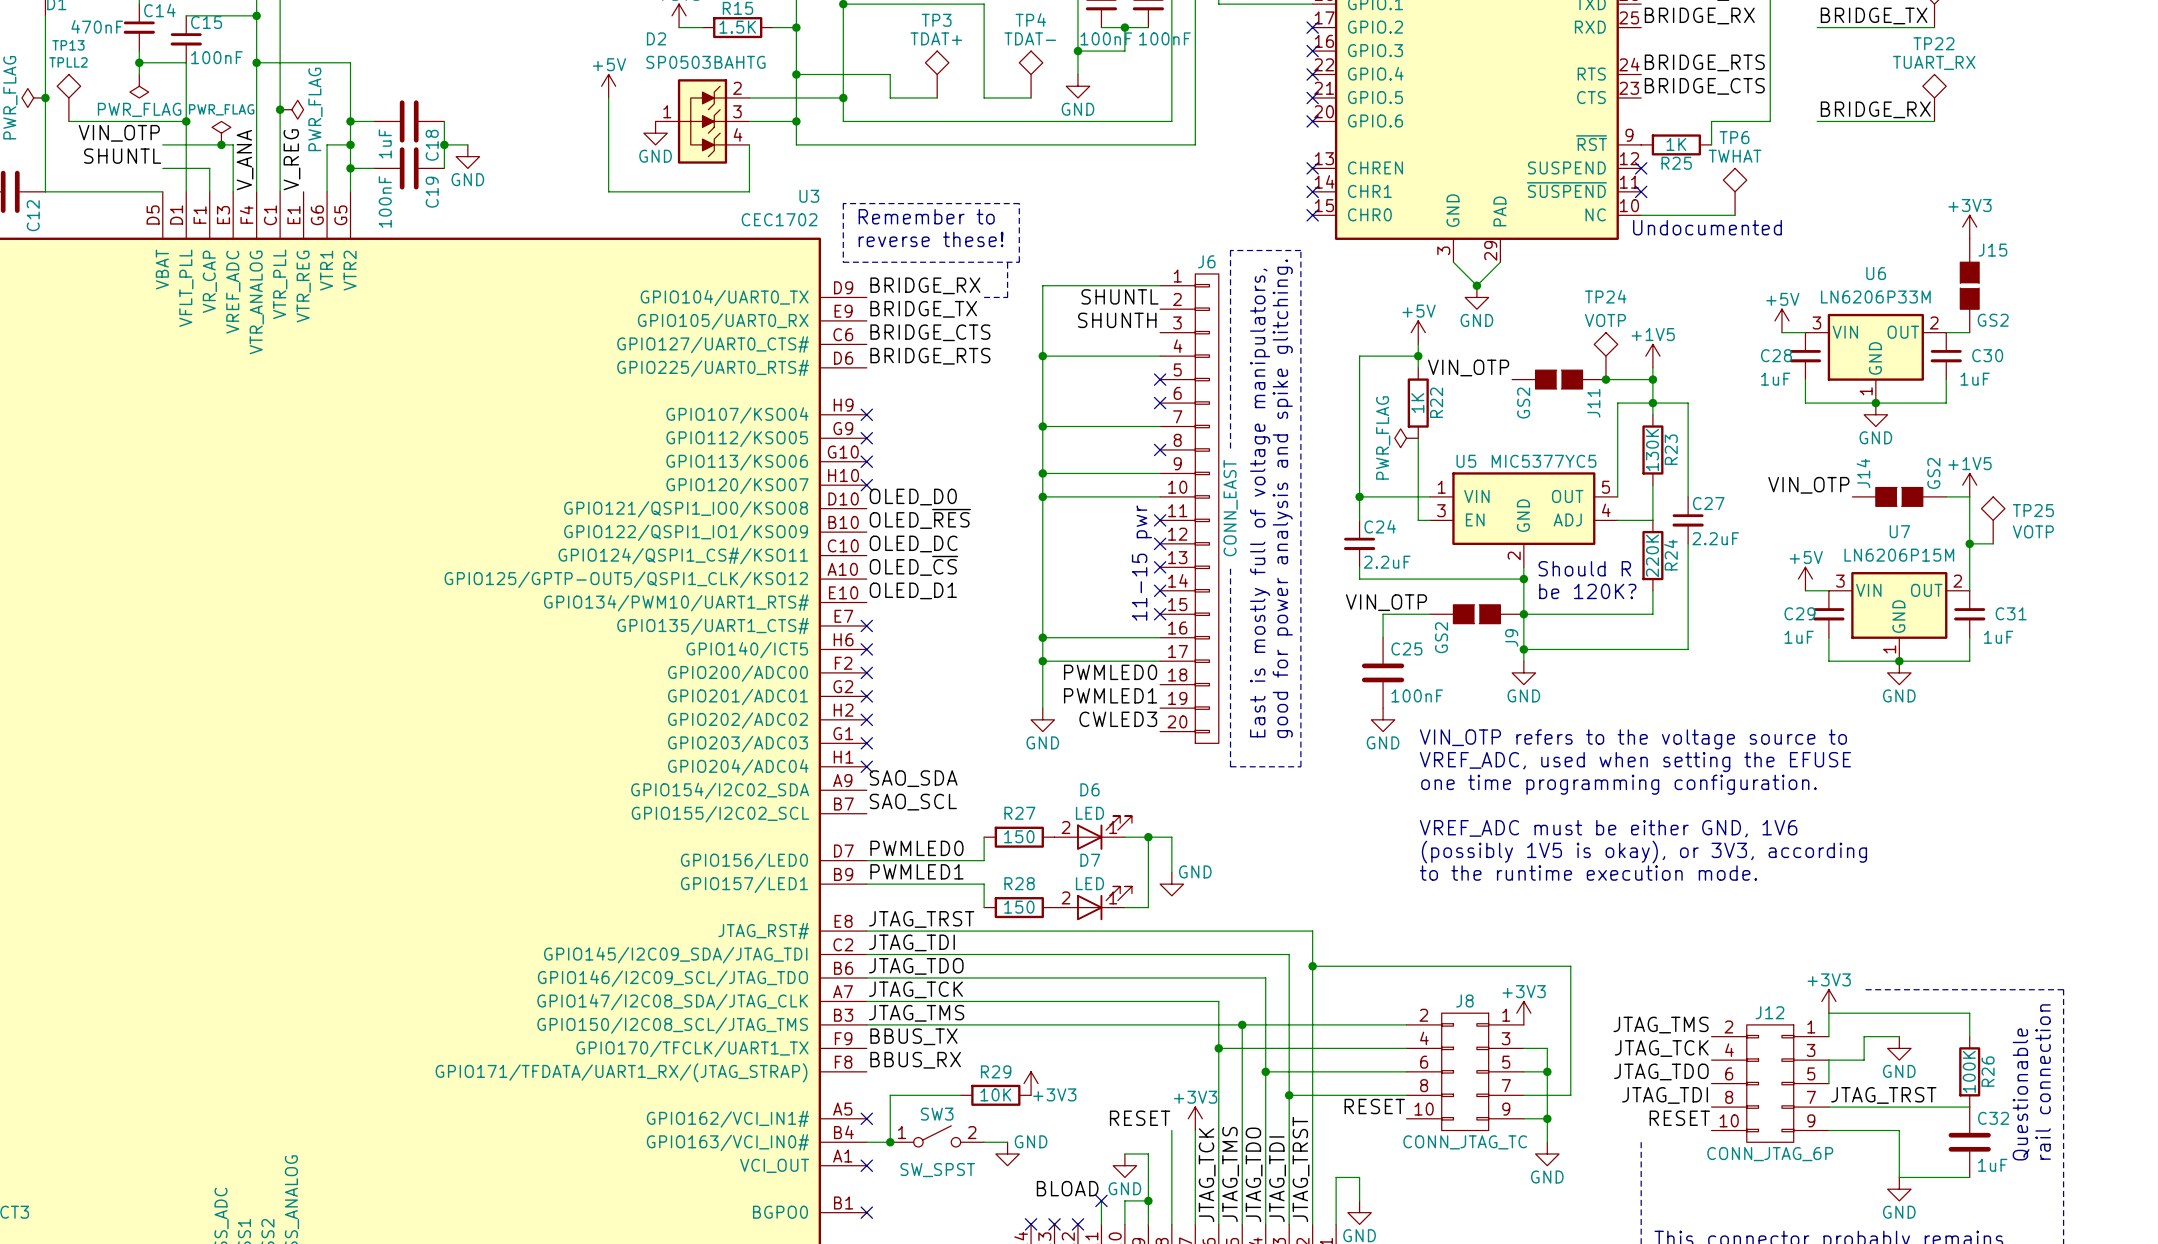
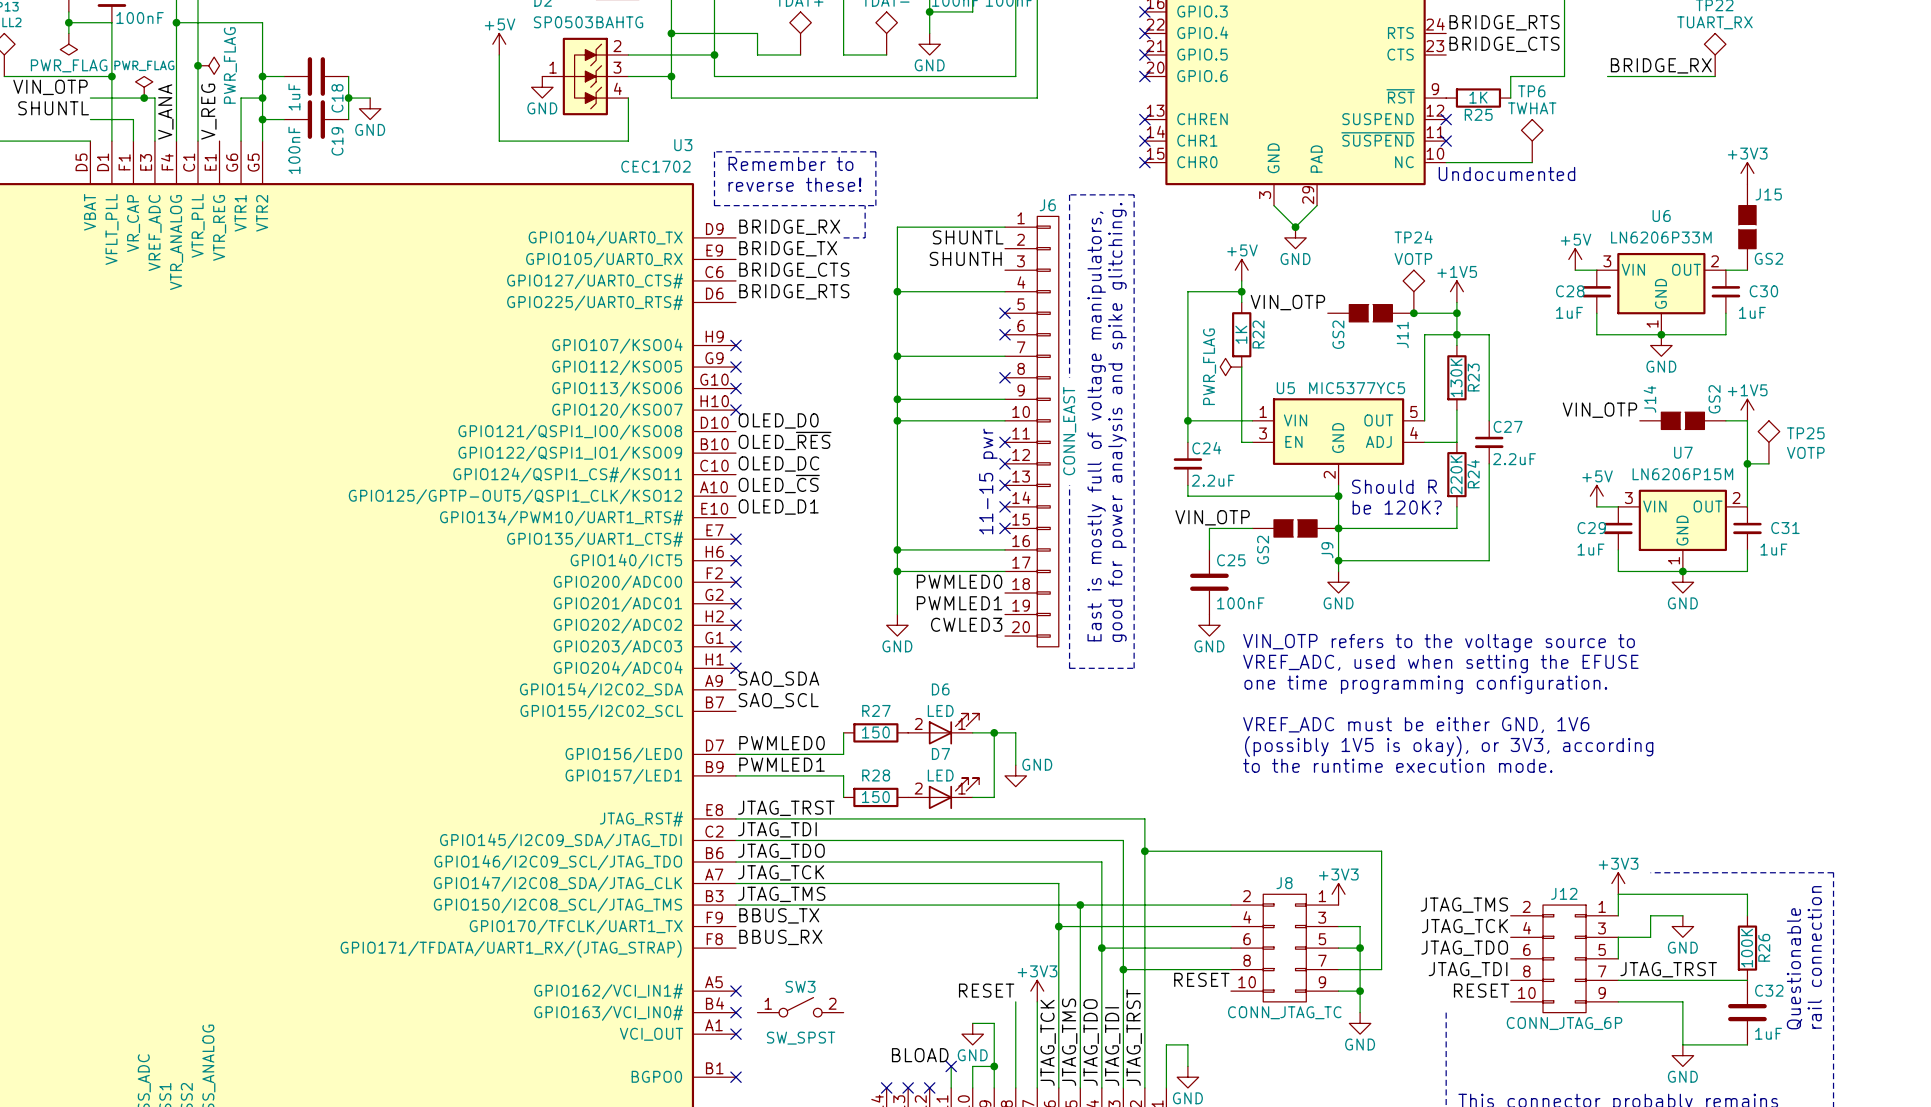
power symbol: +3V3 (1031, 1083) -> none
wire: (960, 1095) (890, 1095) (890, 1142) (866, 1142) -> none
R29: 10K (995, 1095) -> none
no-connect mark: none -> (736, 1012)
junction: (890, 1142) -> none
wire: (984, 1142) (1007, 1142) -> none
power symbol: GND (1007, 1153) -> none

